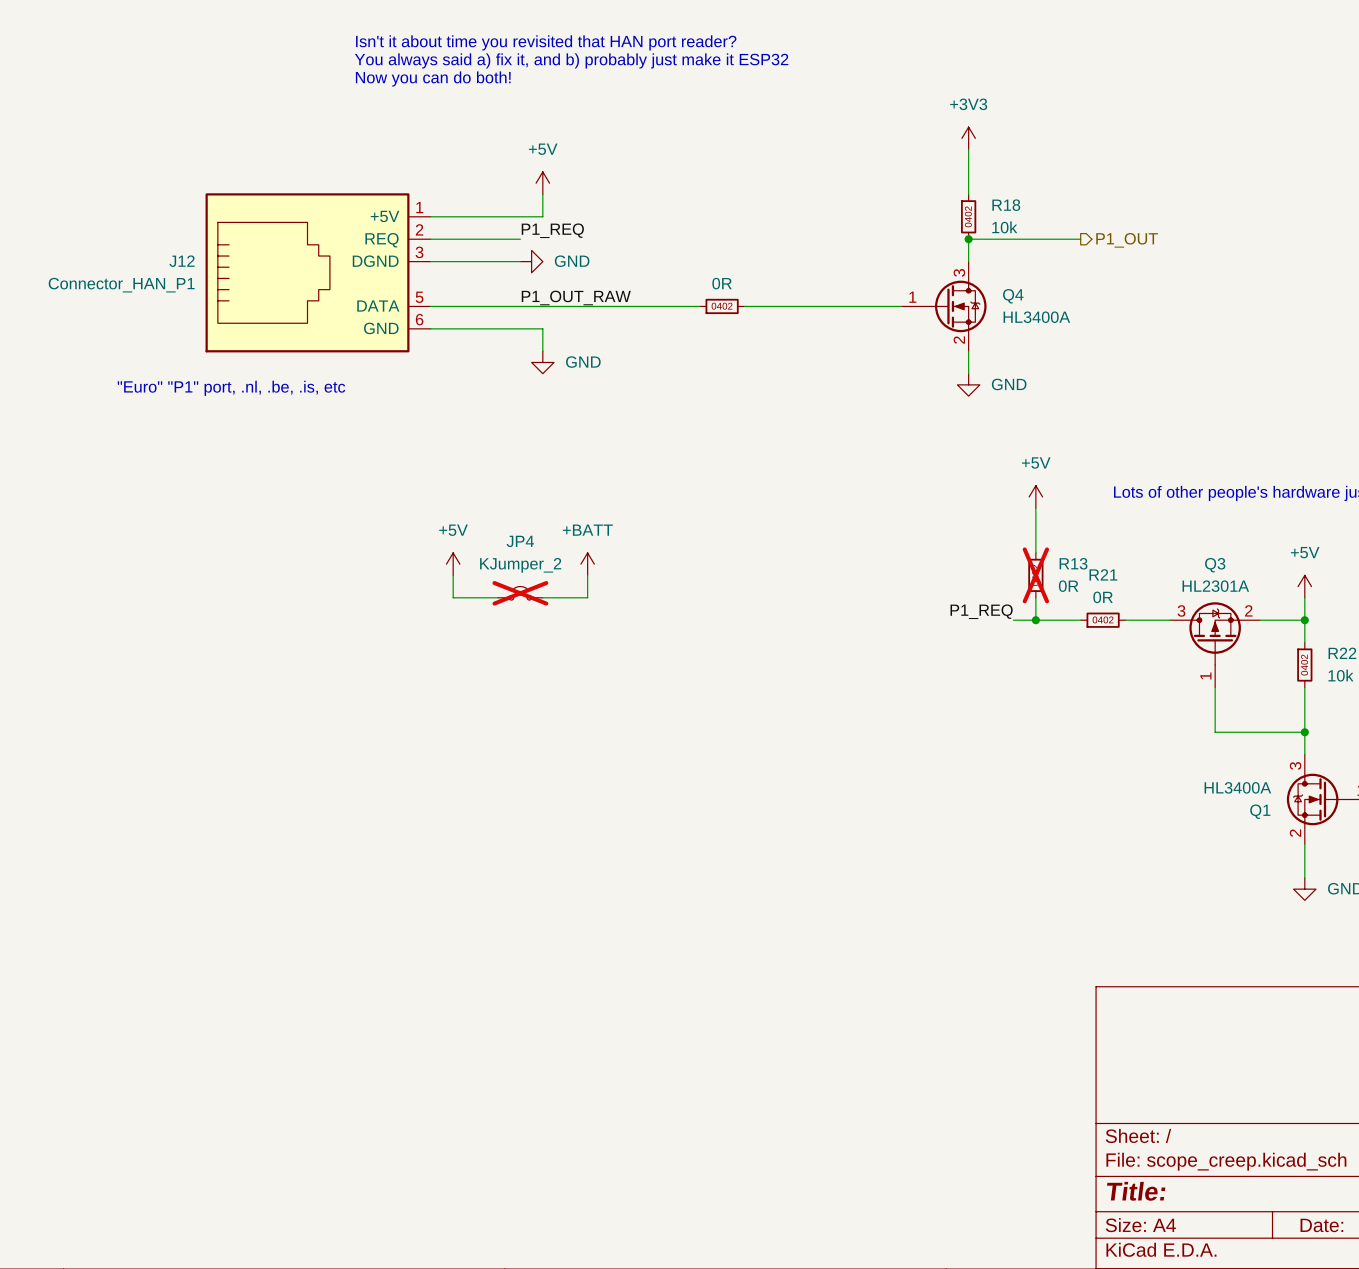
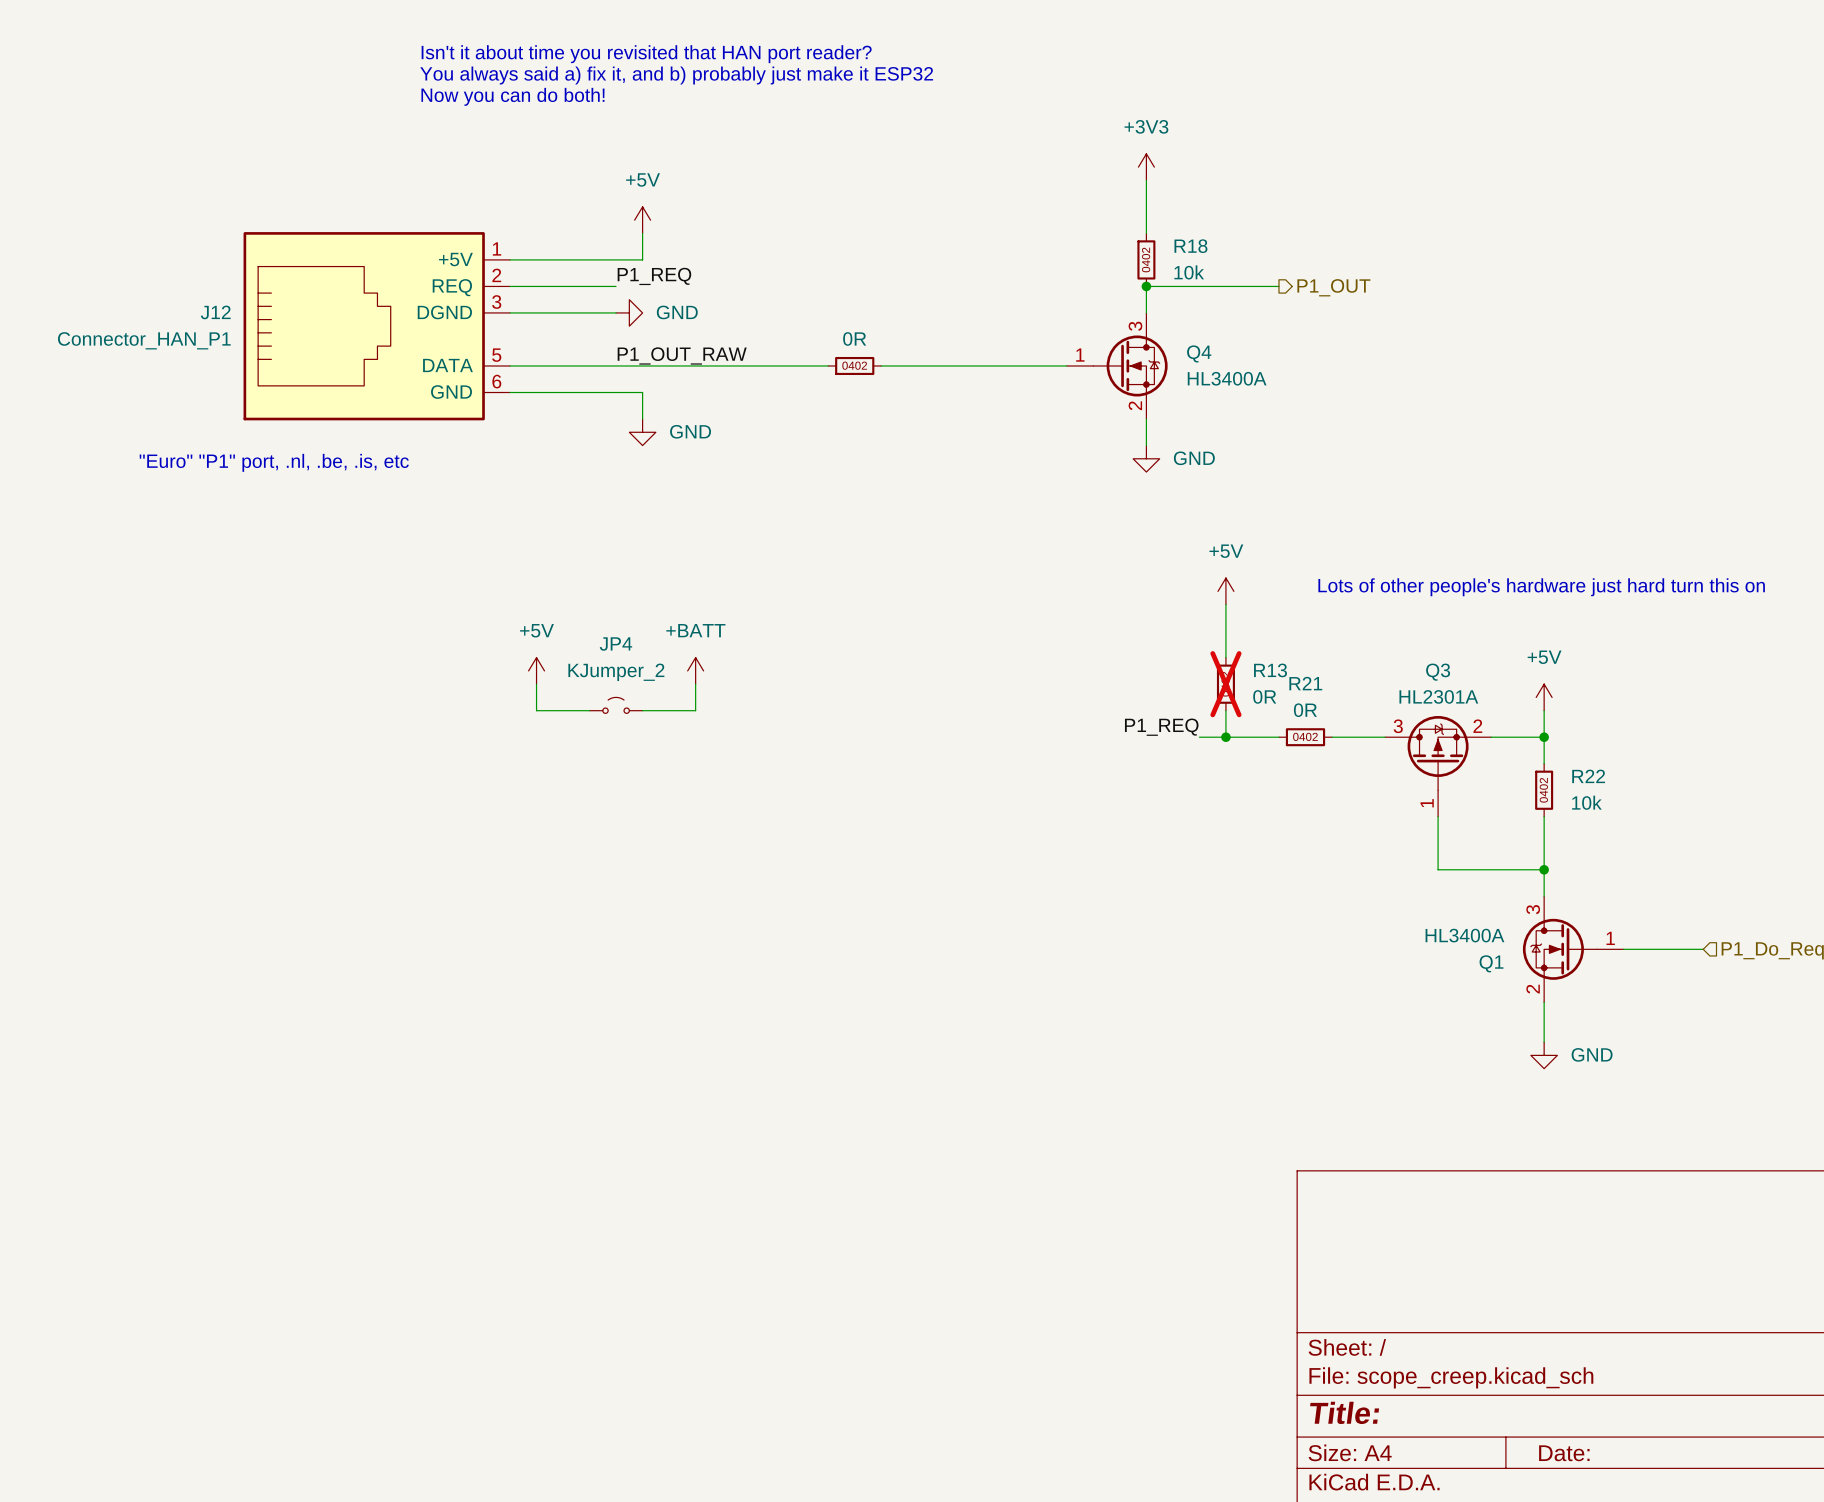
JP4 do-not-place cross: (520, 593) -> none

